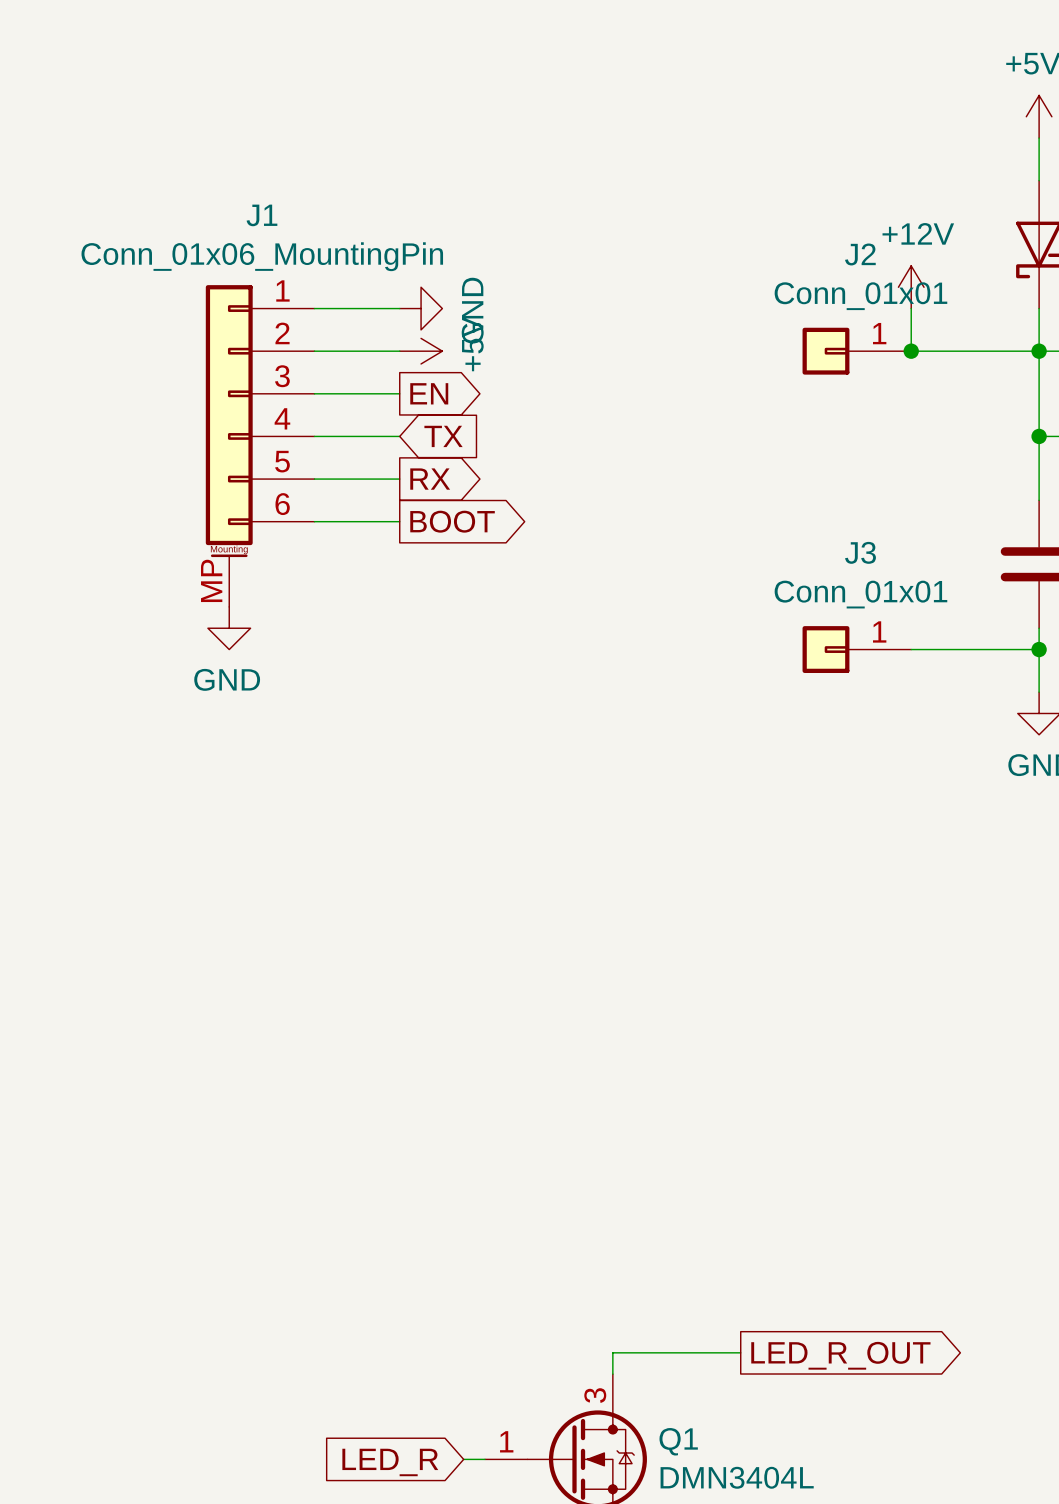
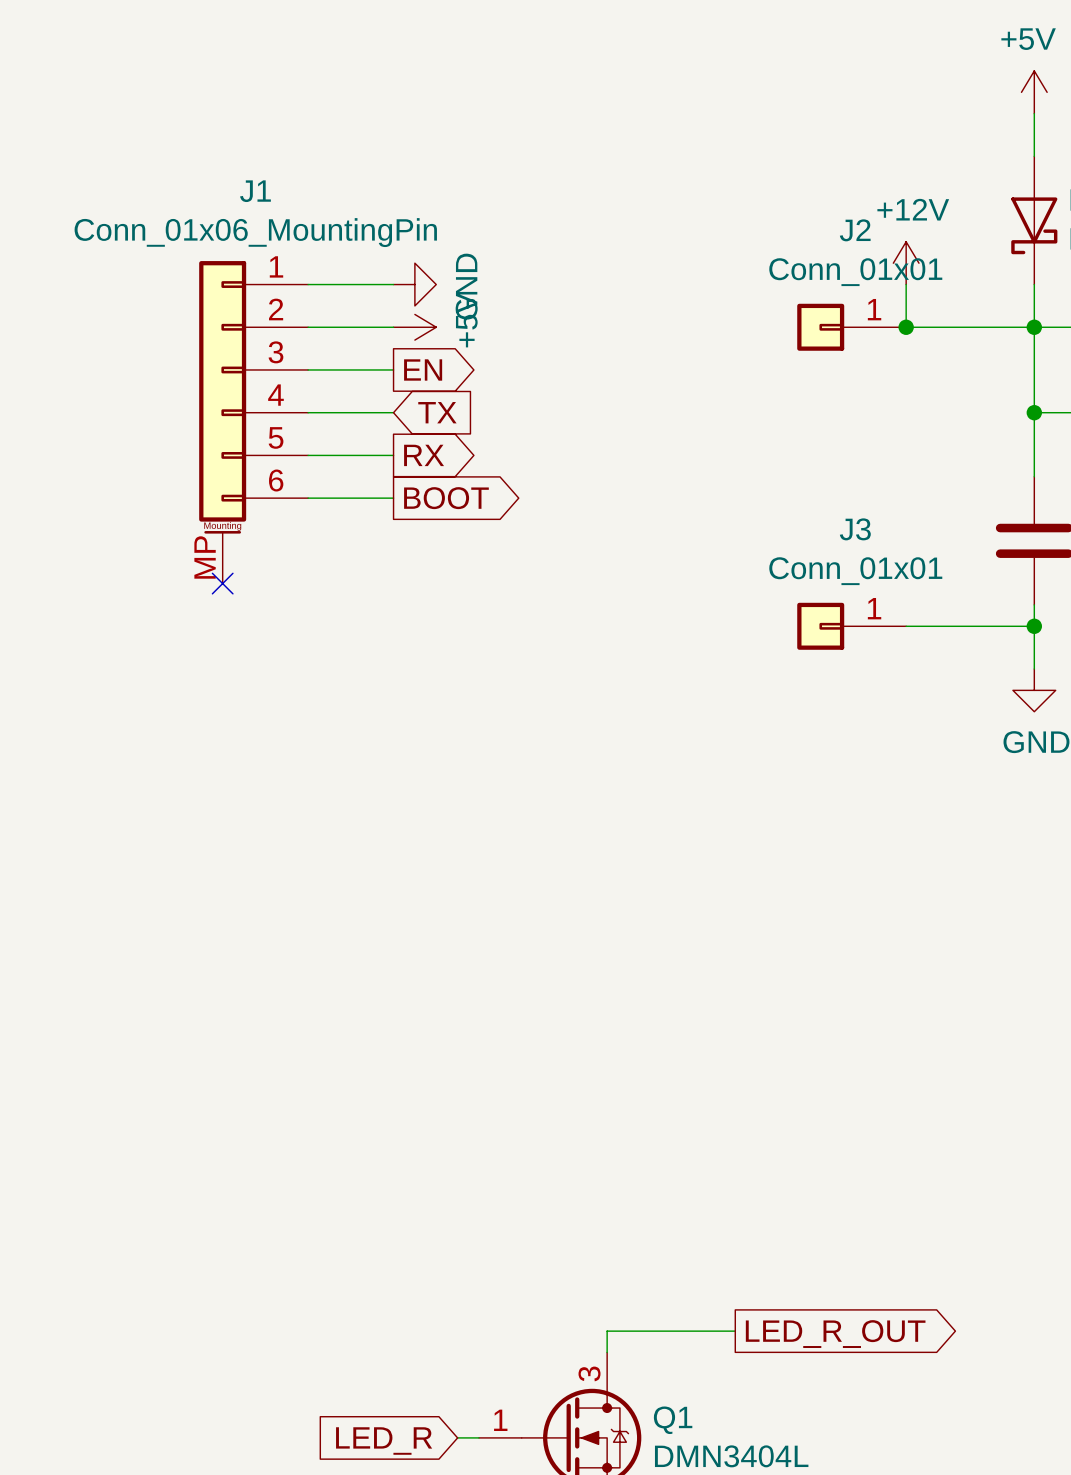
no-connect mark: none -> (222, 583)
power symbol: GND (229, 628) -> none

